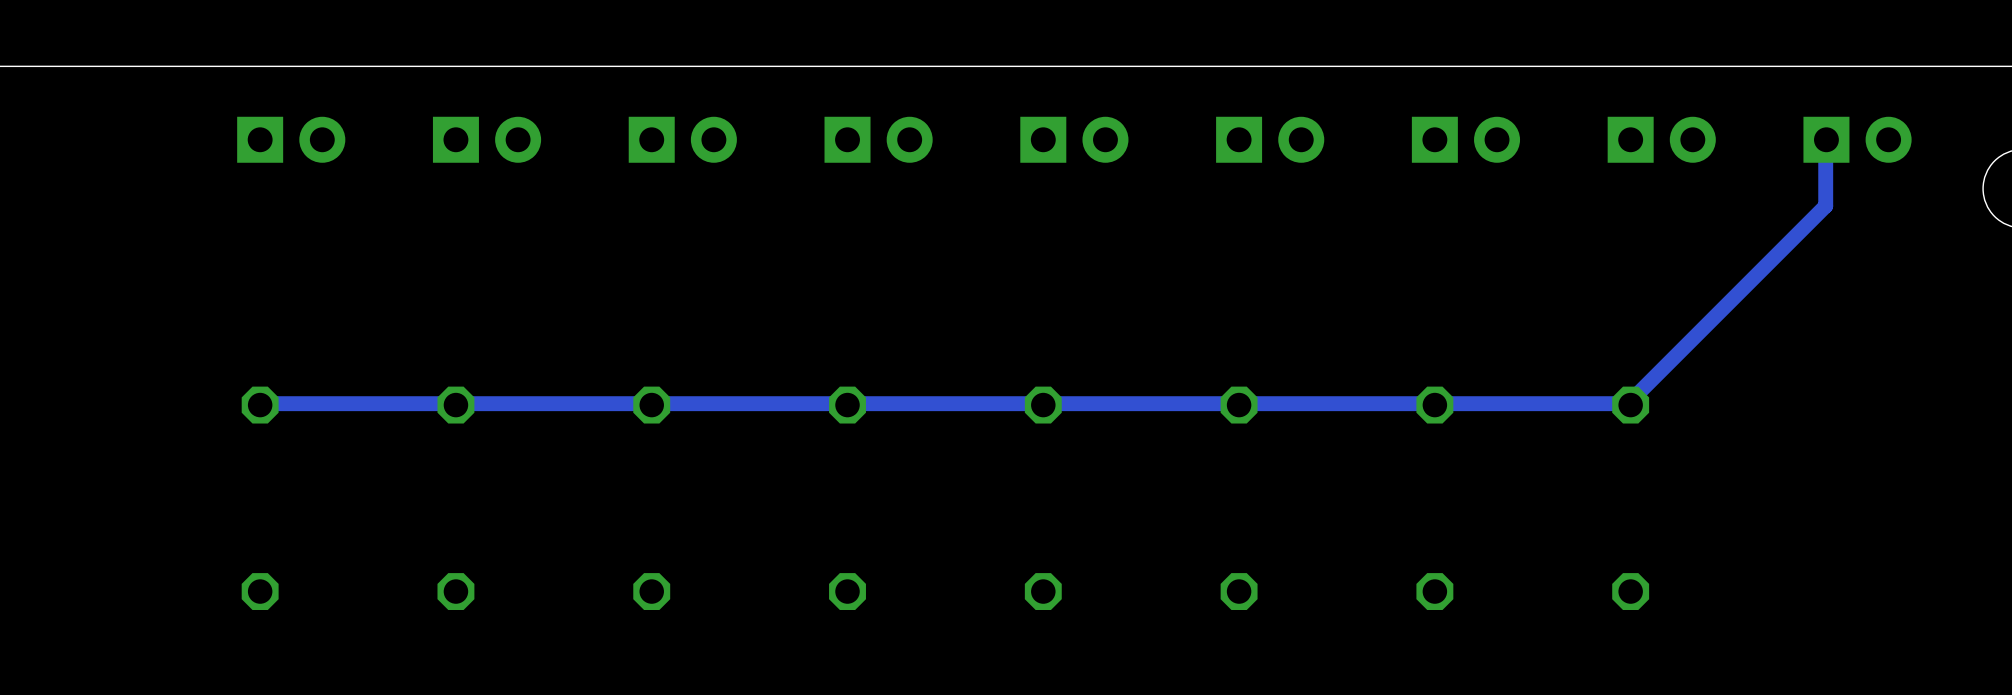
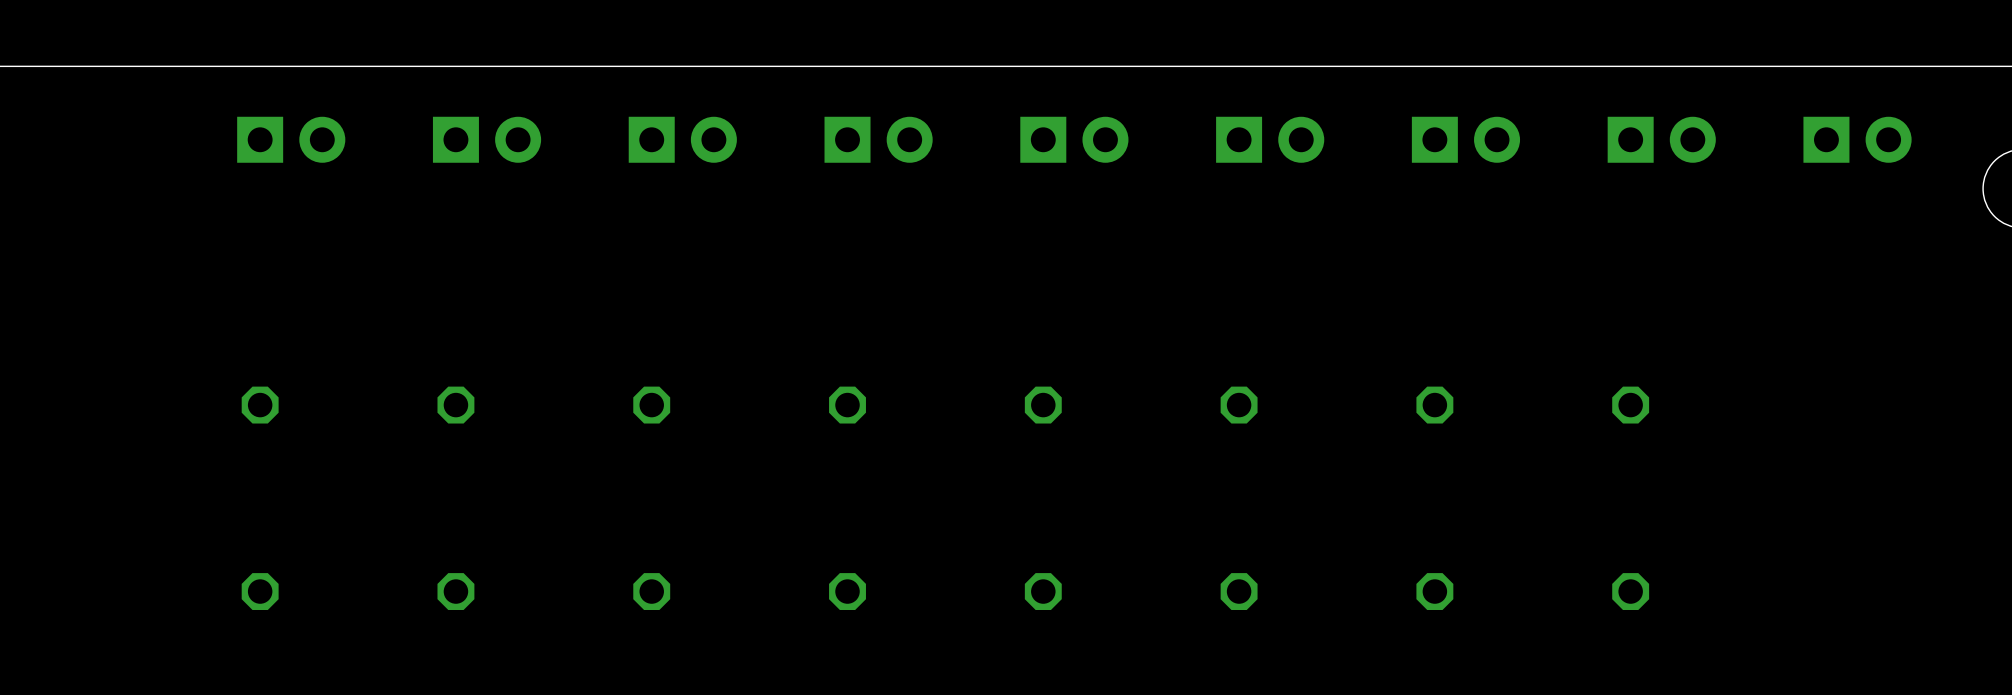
track: (1826, 139) (1825, 205) (1633, 398) (1630, 405) (260, 405) -> none

